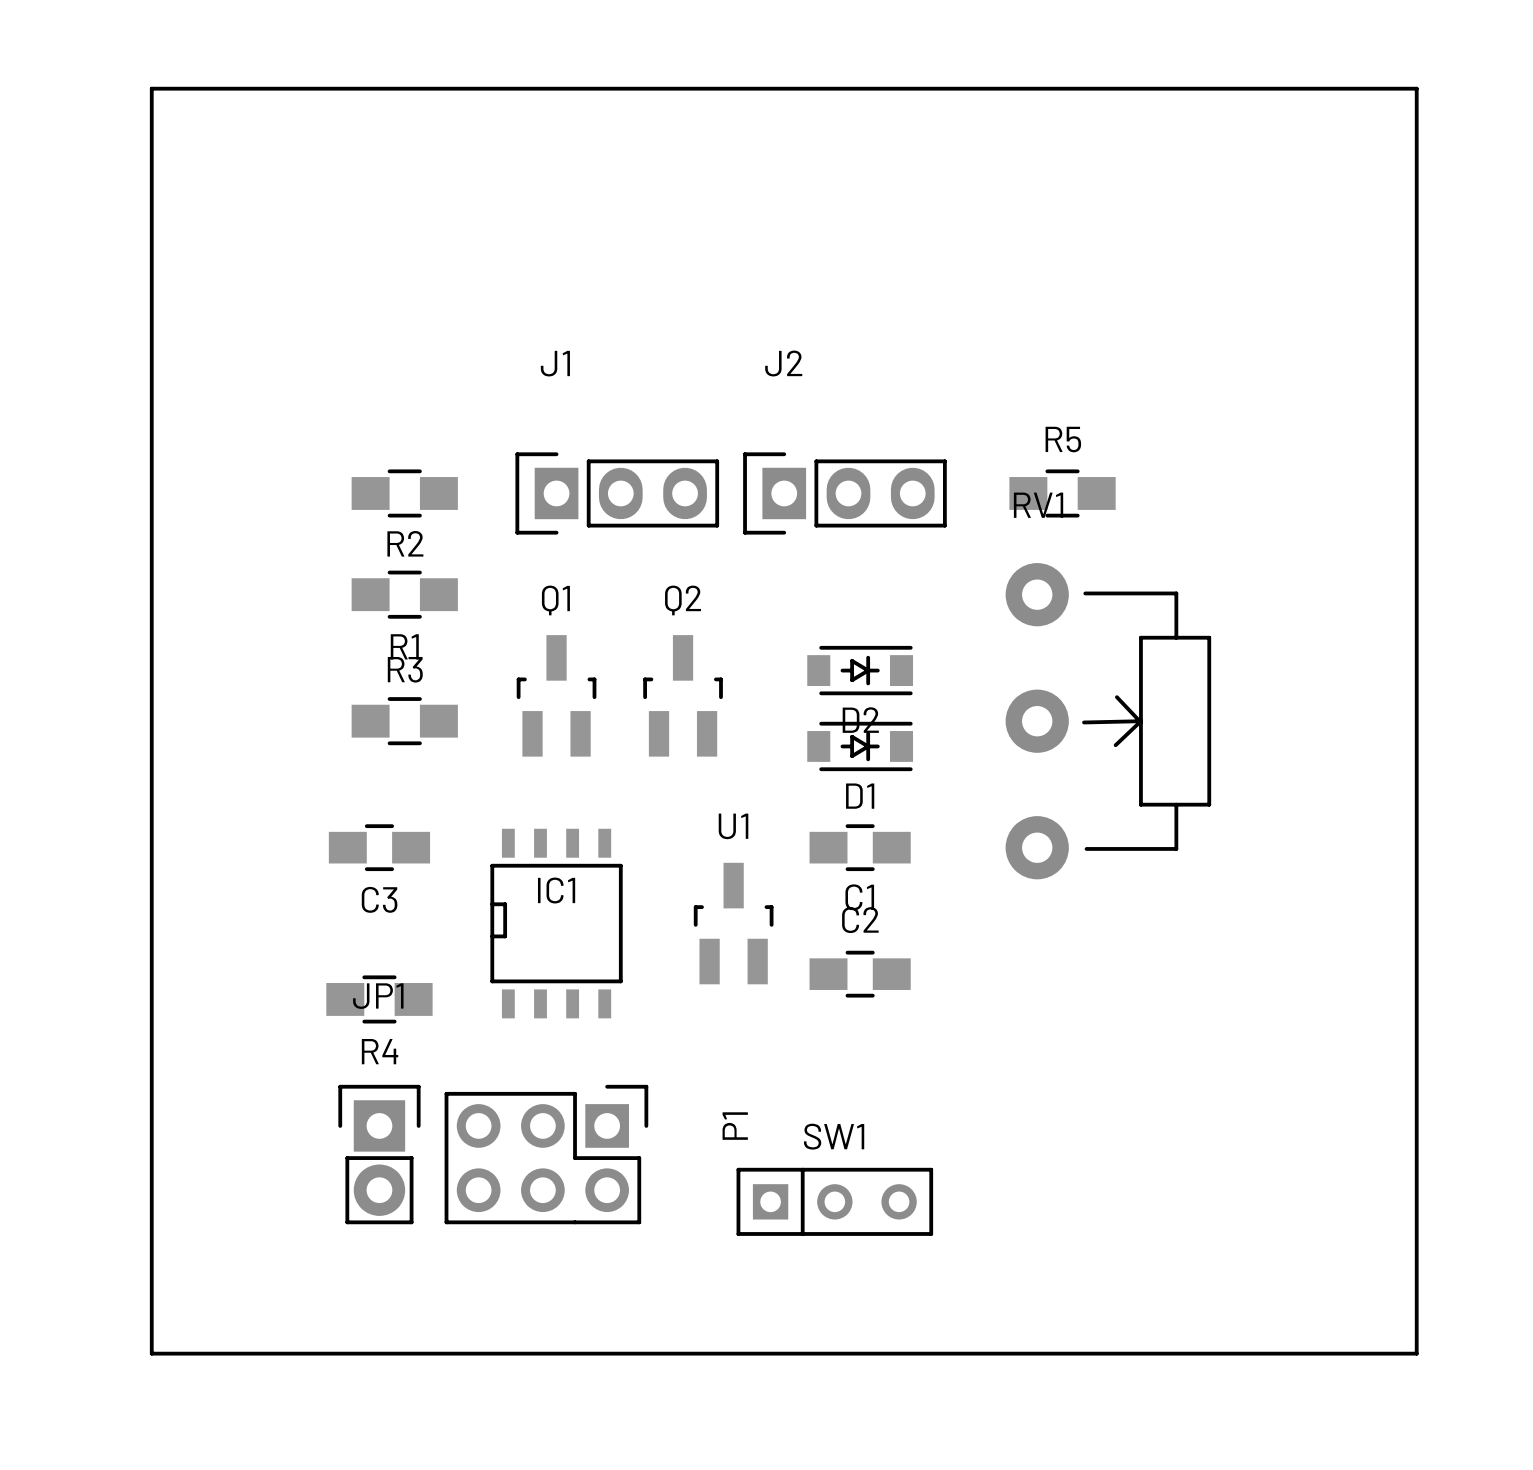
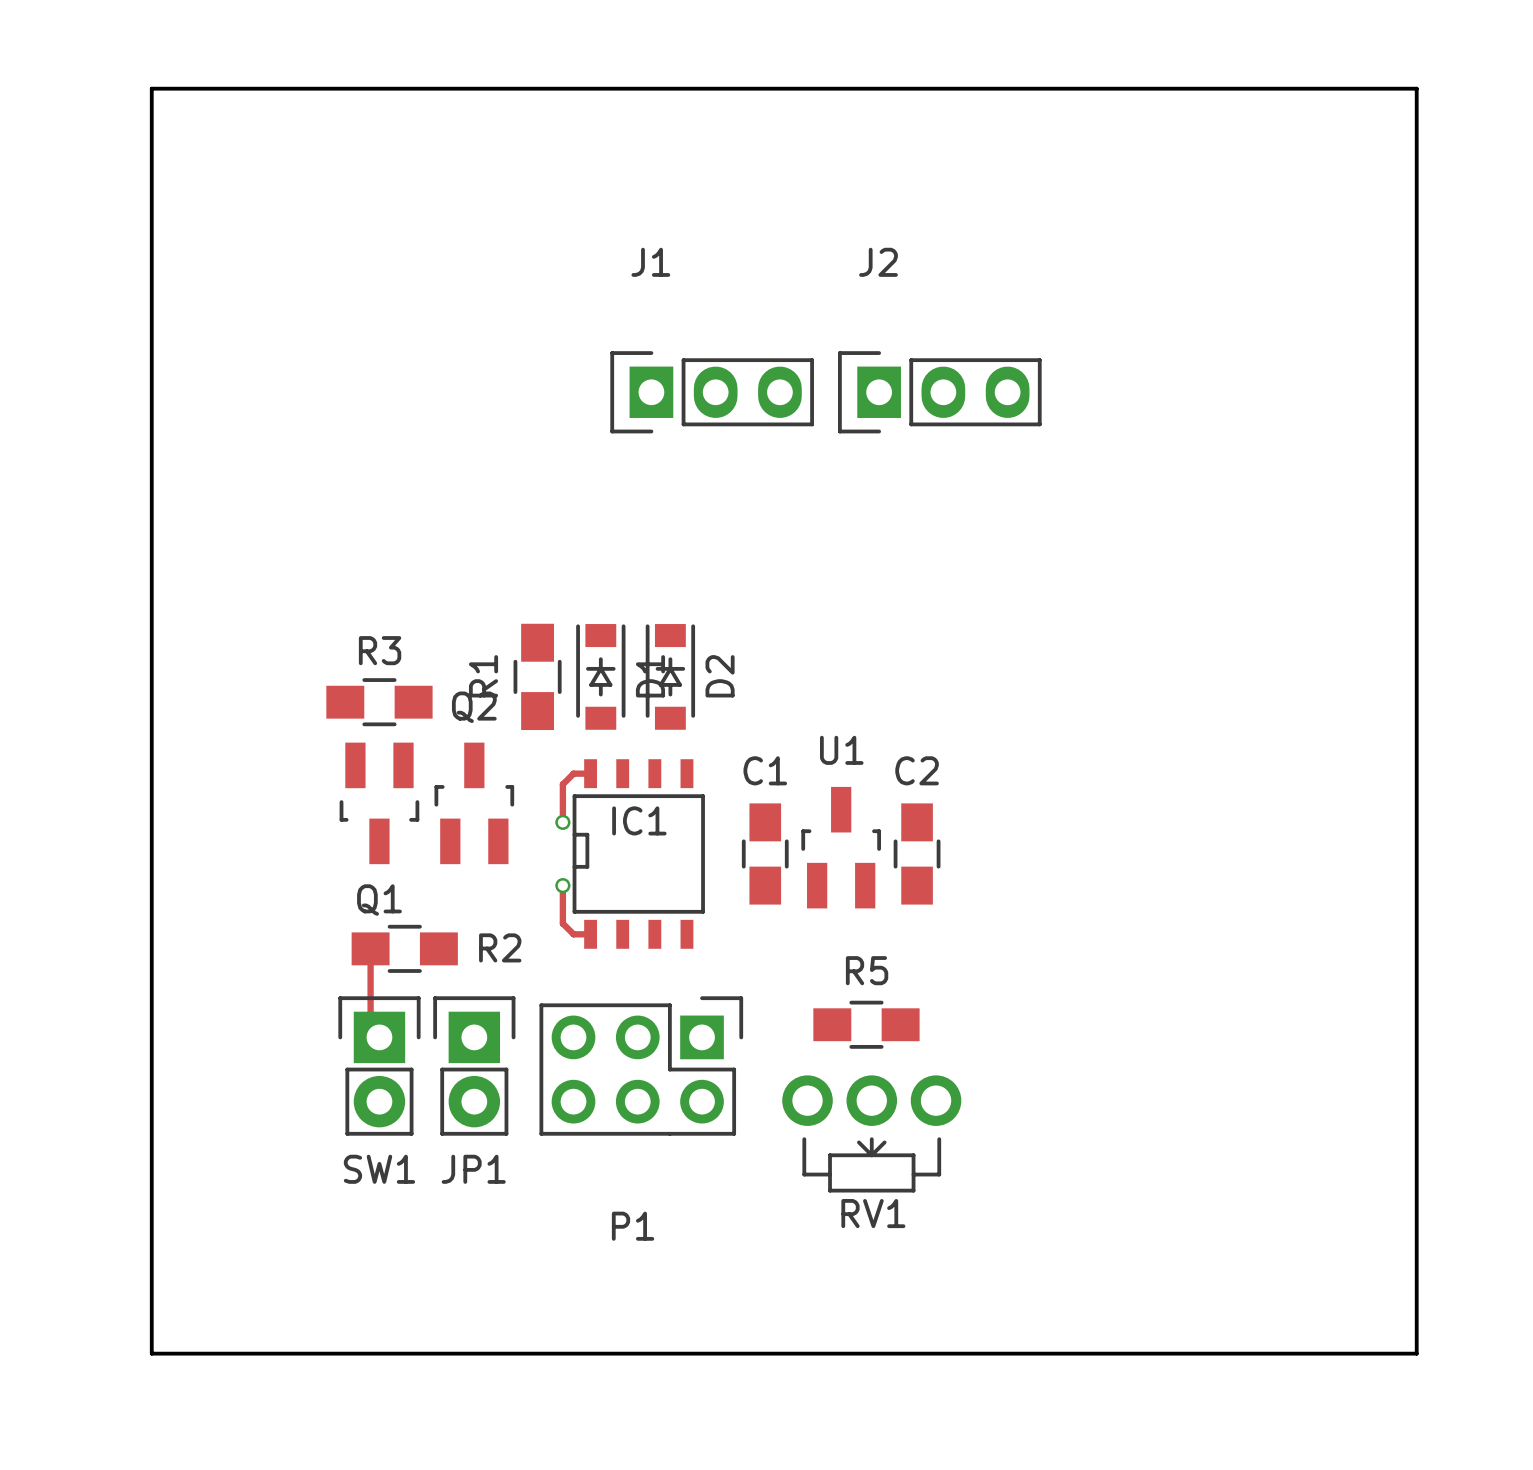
R2 position: (404, 493) -> (404, 948)
J1 position: (617, 493) -> (712, 392)
J2 position: (844, 493) -> (939, 392)
R5 position: (1062, 493) -> (866, 1024)
RV1 name position: RV1 (1038, 505) -> RV1 (873, 1213)
R2 name position: R2 (405, 543) -> R2 (500, 947)
RV1 footprint: [1005, 563, 1212, 880] -> [782, 1075, 962, 1193]
R1 rotation: 0° (404, 594) -> 90° clockwise (537, 676)
R1 position: (404, 594) -> (537, 676)
D2 rotation: 0° (860, 670) -> 90° counterclockwise (670, 676)
D2 position: (860, 670) -> (670, 676)
Q1 rotation: 0° (556, 695) -> 180° (379, 803)
Q1 position: (556, 695) -> (379, 803)
Q2 position: (683, 695) -> (474, 803)
R3 position: (404, 721) -> (379, 702)
D1 rotation: 0° (860, 746) -> 90° counterclockwise (600, 676)
D1 position: (860, 746) -> (600, 676)
track: none -> (590, 773) (573, 773) (562, 784) (562, 822)
via: none -> (562, 822)
C3: (379, 847) -> none
C1 rotation: 0° (860, 847) -> 90° clockwise (765, 853)
C1 position: (860, 847) -> (765, 853)
track: none -> (562, 885) (562, 923) (573, 934) (590, 934)
via: none -> (562, 885)
C1 name position: C1 (859, 897) -> C1 (765, 770)
IC1 position: (556, 923) -> (638, 853)
U1 position: (733, 923) -> (841, 847)
track: none -> (370, 948) (370, 1028) (379, 1037)
C2 rotation: 0° (860, 974) -> 90° clockwise (917, 853)
C2 position: (860, 974) -> (917, 853)
JP1 name position: JP1 (378, 996) -> JP1 (473, 1169)
R4: (379, 999) -> none
P1 name rotation: 0° (735, 1126) -> 90° clockwise (633, 1226)
P1 name position: P1 (735, 1126) -> P1 (633, 1226)
SW1 name position: SW1 (834, 1136) -> SW1 (379, 1169)
JP1 position: (379, 1154) -> (474, 1065)
P1 position: (546, 1154) -> (641, 1065)
SW1 footprint: [736, 1167, 934, 1236] -> [338, 996, 421, 1136]

